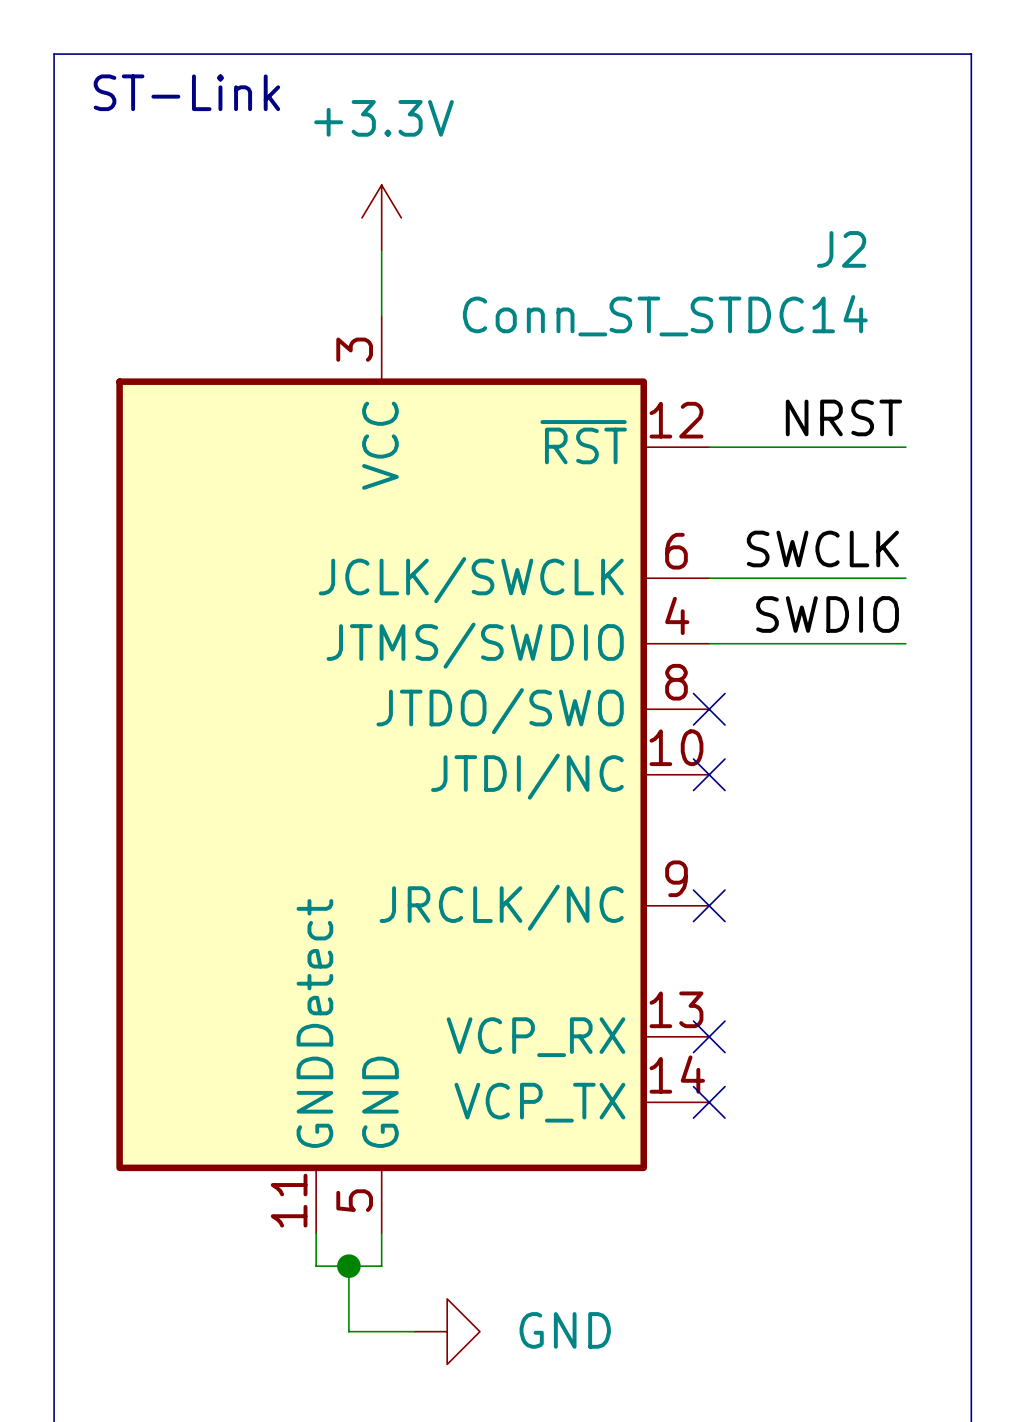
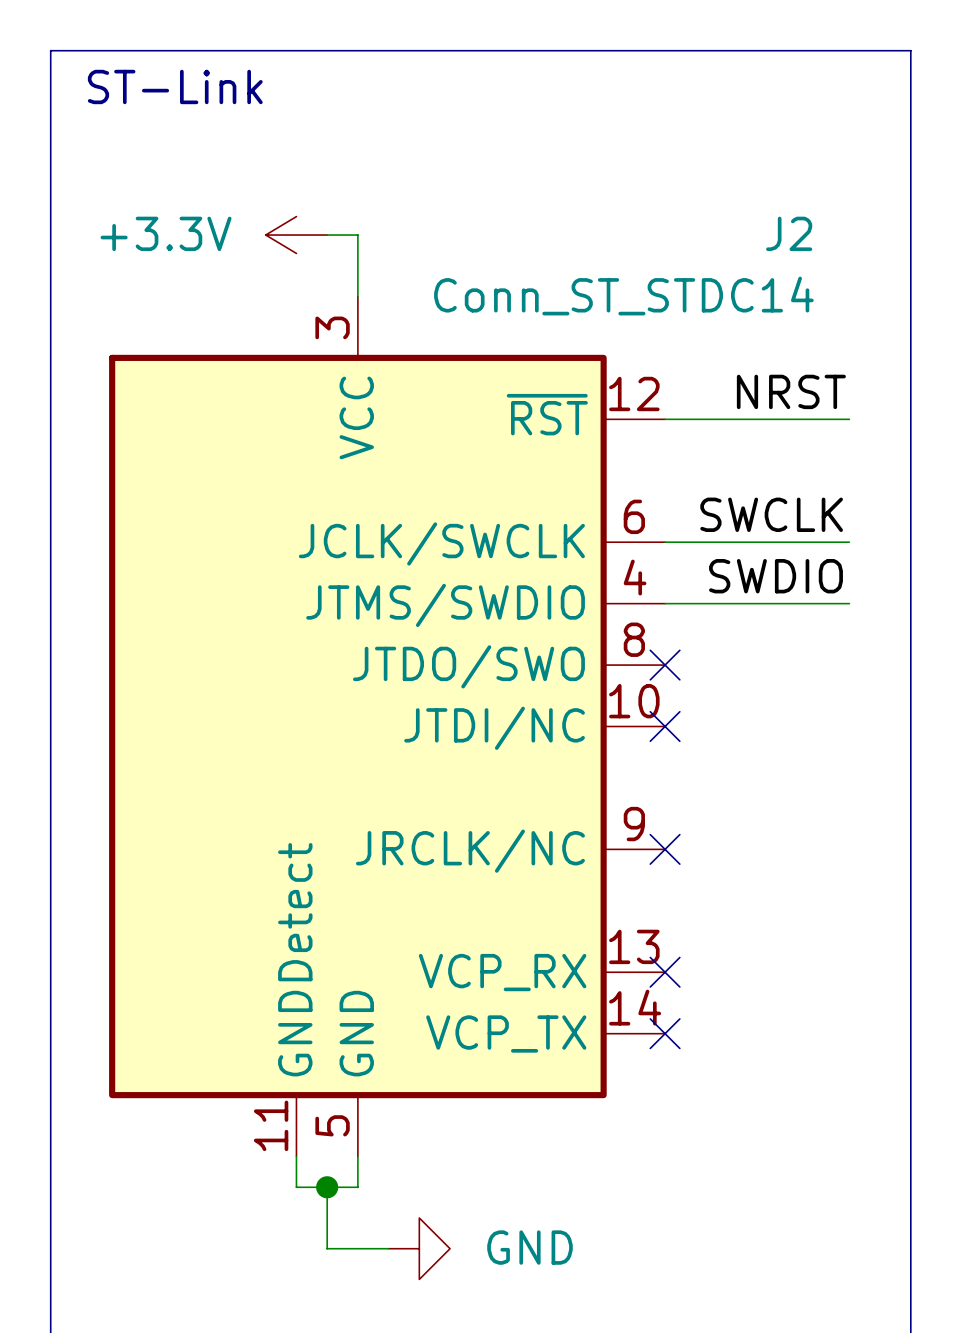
power symbol text position: +3.3V (384, 118) -> +3.3V (166, 233)
power symbol rotation: 0° (381, 217) -> 90° counterclockwise (296, 235)
power symbol position: +3.3V (381, 217) -> +3.3V (296, 235)
wire: none -> (327, 235) (357, 235)

